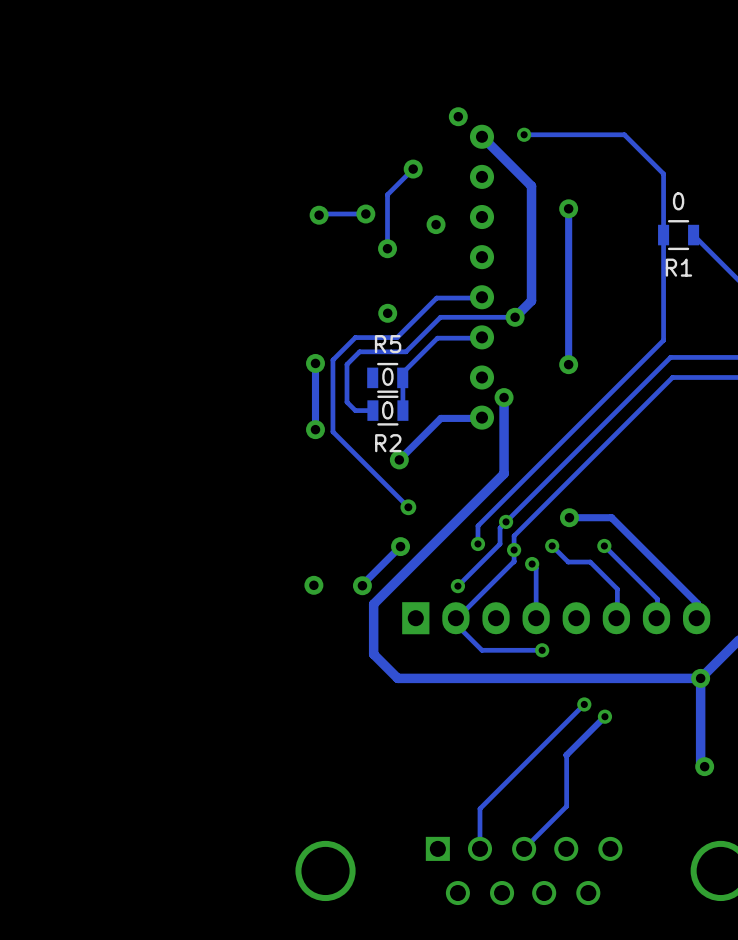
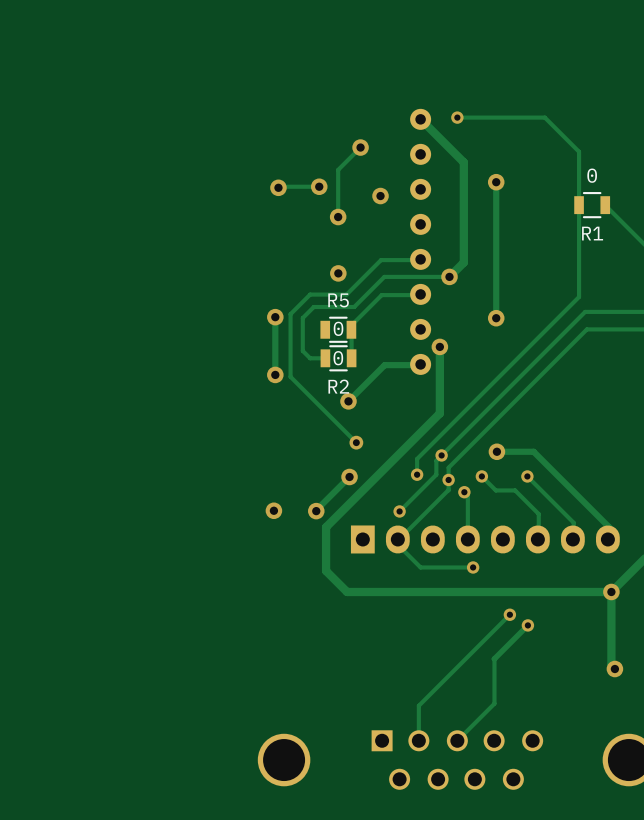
via: (458, 116) -> none

